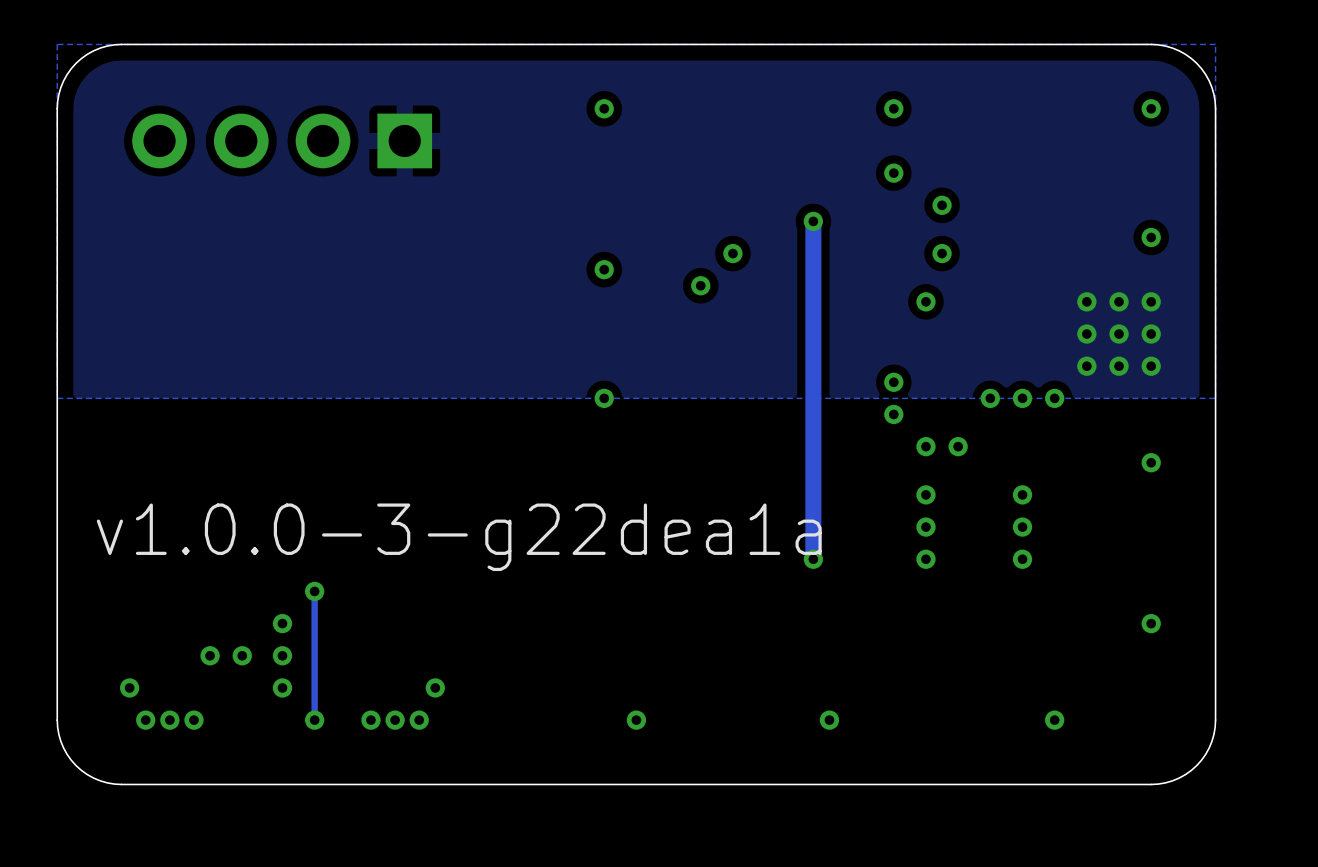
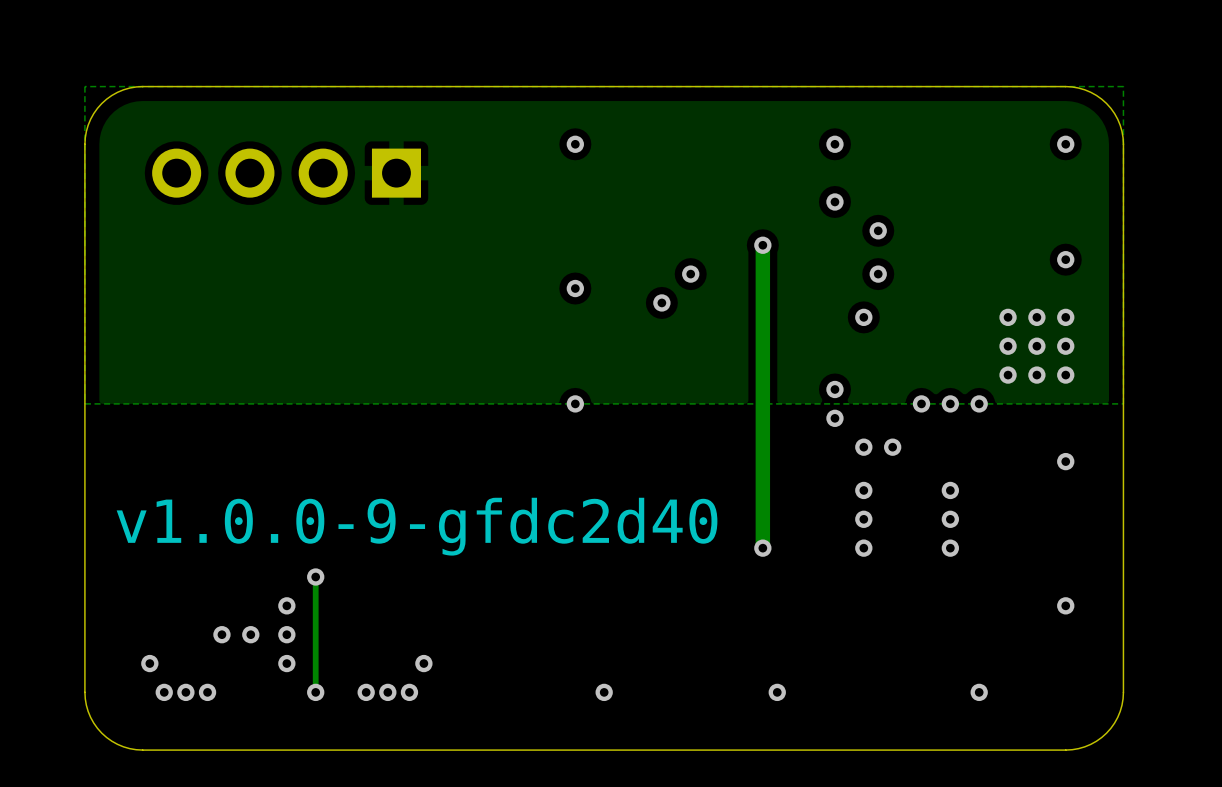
text: v1.0.0-3-g22dea1a (459, 537) -> v1.0.0-9-gfdc2d40 (417, 526)

